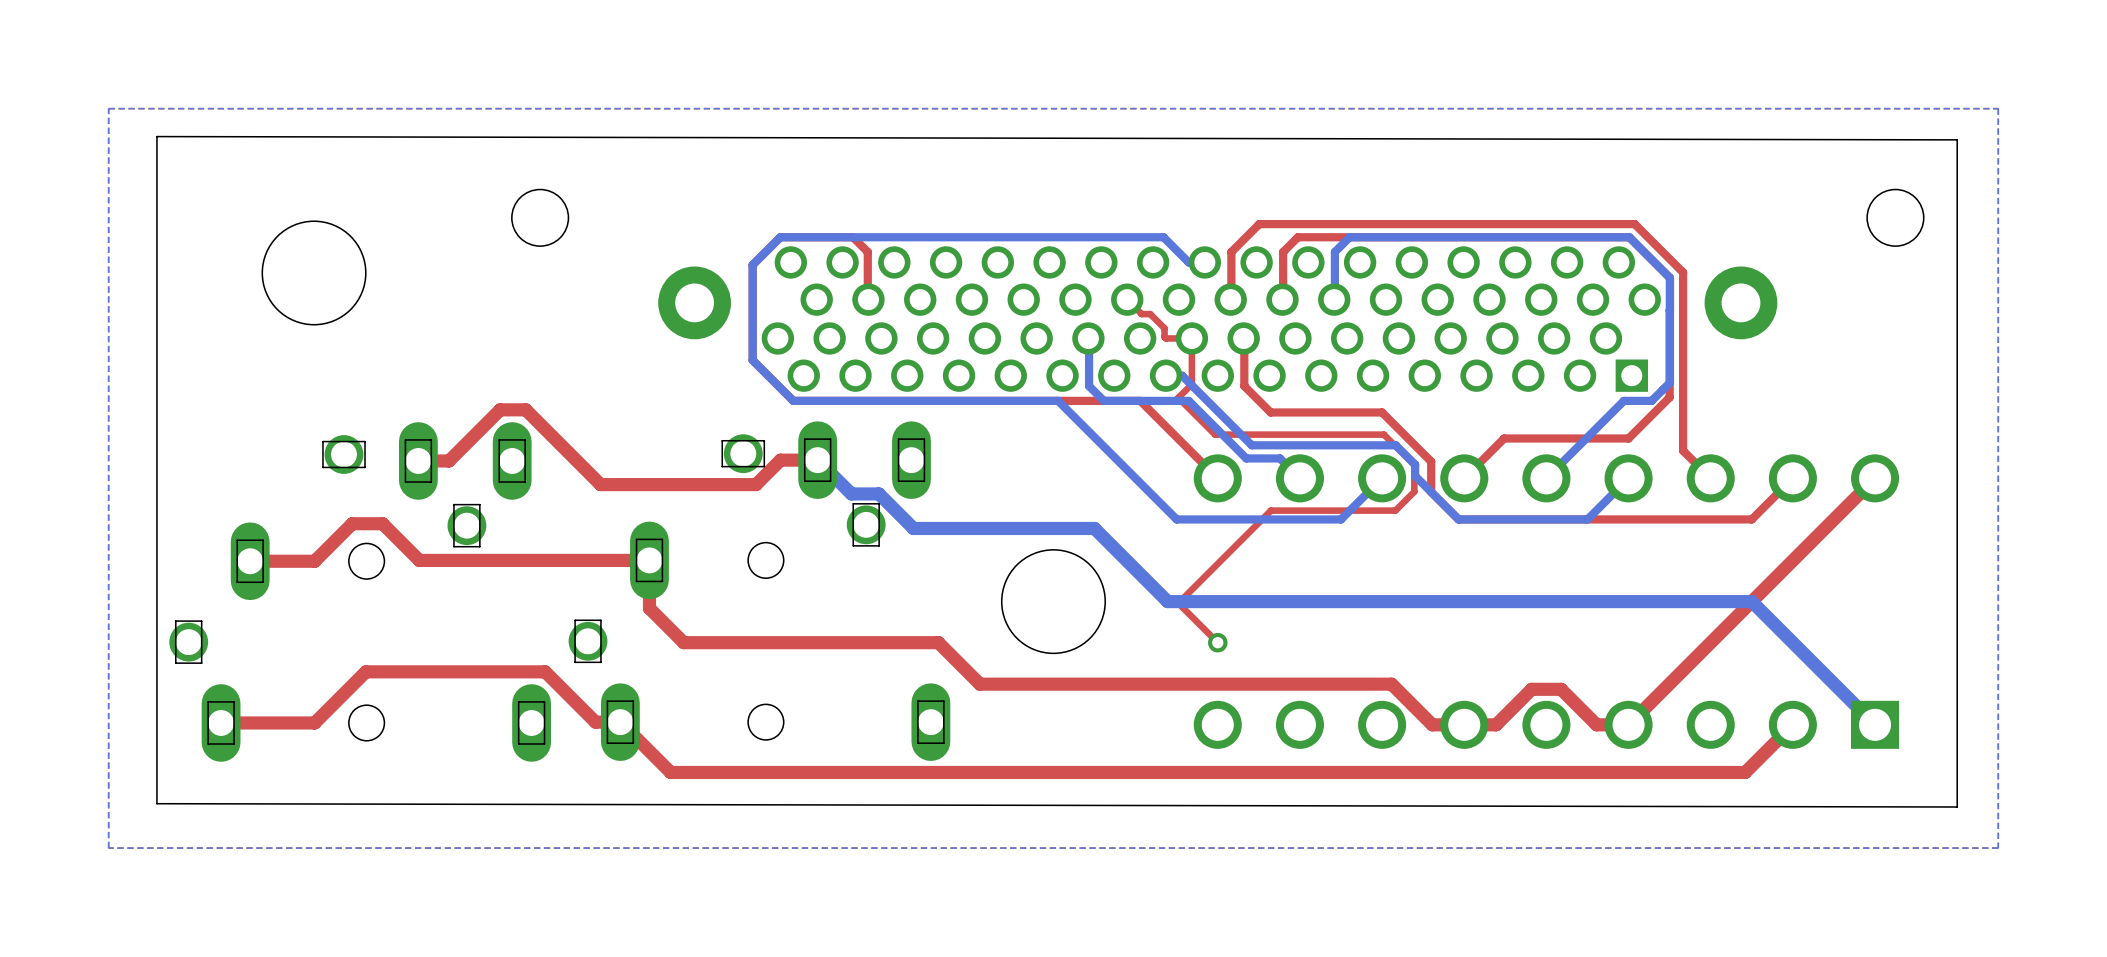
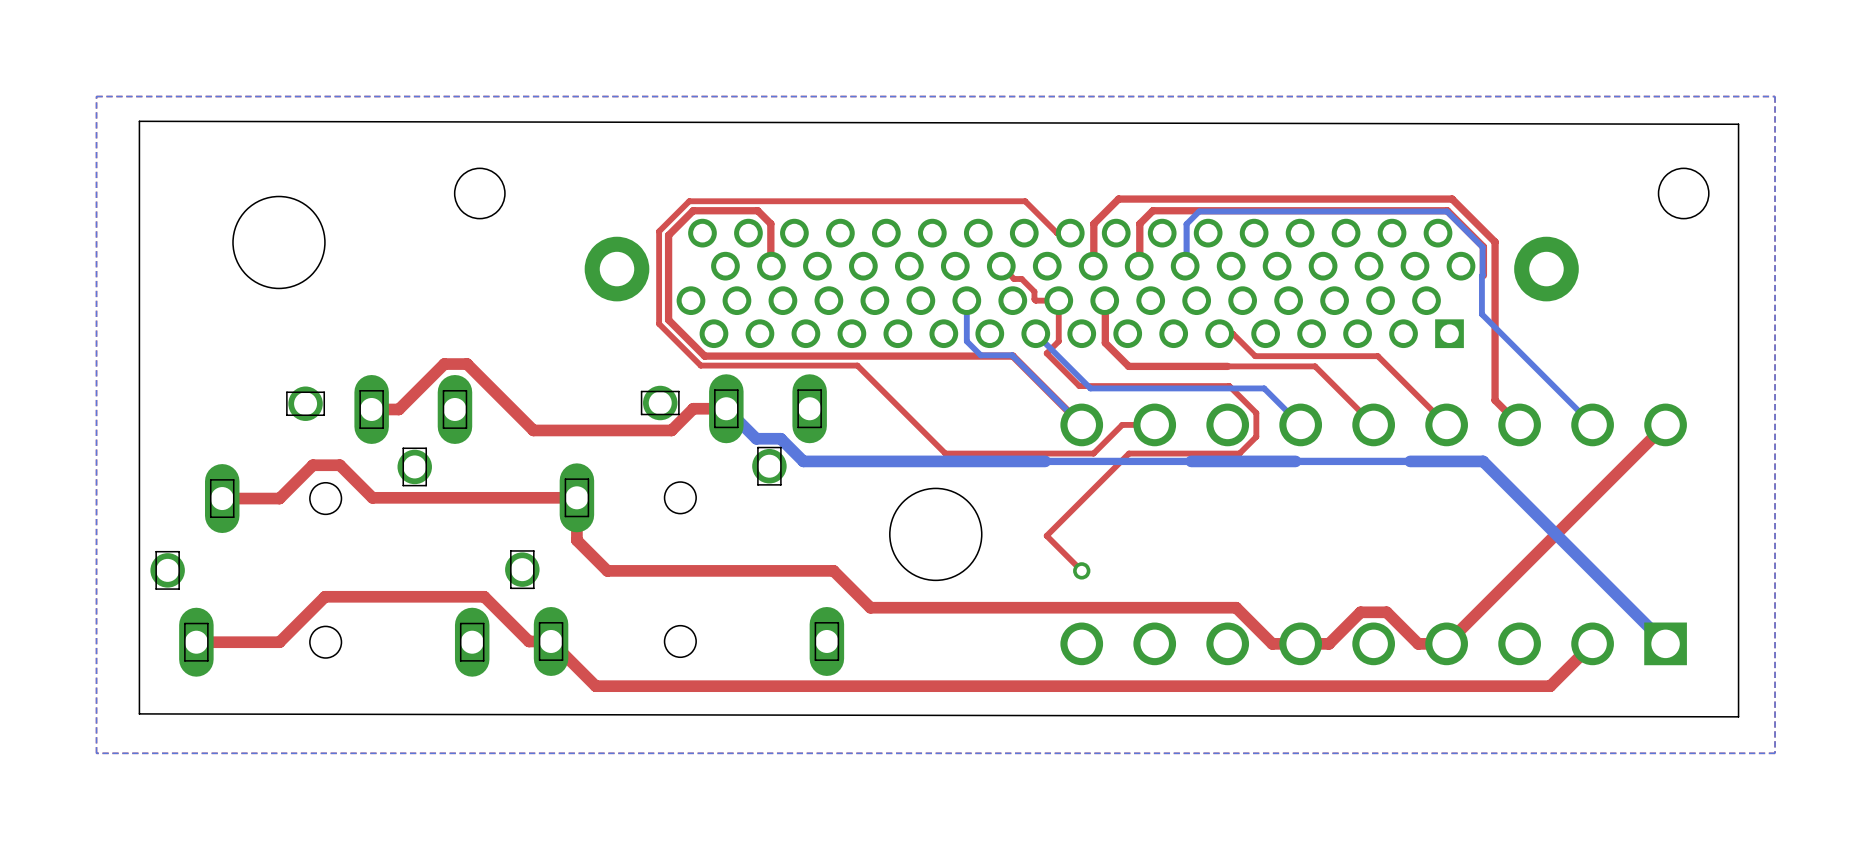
bottom track: none -> (1187, 224) (1187, 264) (1185, 266) (1186, 224) (1199, 211) (1446, 211) (1482, 247) (1481, 314) (1592, 424)
top track: none -> (1070, 233) (1057, 233) (1025, 201) (689, 201) (659, 231) (659, 323) (700, 365) (857, 365) (945, 453) (1093, 453) (1122, 424) (1154, 424)
bottom track: (1204, 262) (1188, 262) (1163, 237) (780, 237) (752, 264) (752, 360) (793, 400) (1058, 400) (1176, 519) -> (803, 461) (1045, 461)
bottom track: (1334, 298) (1334, 252) (1349, 237) (1629, 237) (1669, 277) (1669, 382) (1651, 400) (1623, 400) (1546, 478) -> none
top track: (1669, 310) (1669, 397) (1628, 438) (1504, 438) (1464, 478) -> none
bottom track: (1088, 338) (1089, 386) (1103, 400) (1188, 400) (1246, 458) (1280, 458) (1299, 478) -> (966, 300) (966, 341) (980, 355) (1012, 355) (1081, 424)
bottom track: (1166, 375) (1182, 375) (1251, 445) (1395, 445) (1415, 464) (1415, 476) (1458, 519) -> (1035, 333) (1090, 388) (1264, 388) (1300, 424)
top track: none -> (1219, 333) (1232, 333) (1255, 356) (1377, 356) (1446, 424)
top track: (1382, 412) (1431, 461) (1431, 492) (1458, 519) (1751, 519) (1792, 478) -> (1227, 366) (1315, 366) (1373, 424)
bottom track: (1382, 478) (1341, 519) -> (1295, 461) (1191, 461)
bottom track: (1628, 478) (1587, 519) -> (1556, 534) (1483, 461) (1410, 461)
bottom track: (904, 519) (913, 528) (1094, 528) (1167, 601) (1751, 601) -> none

